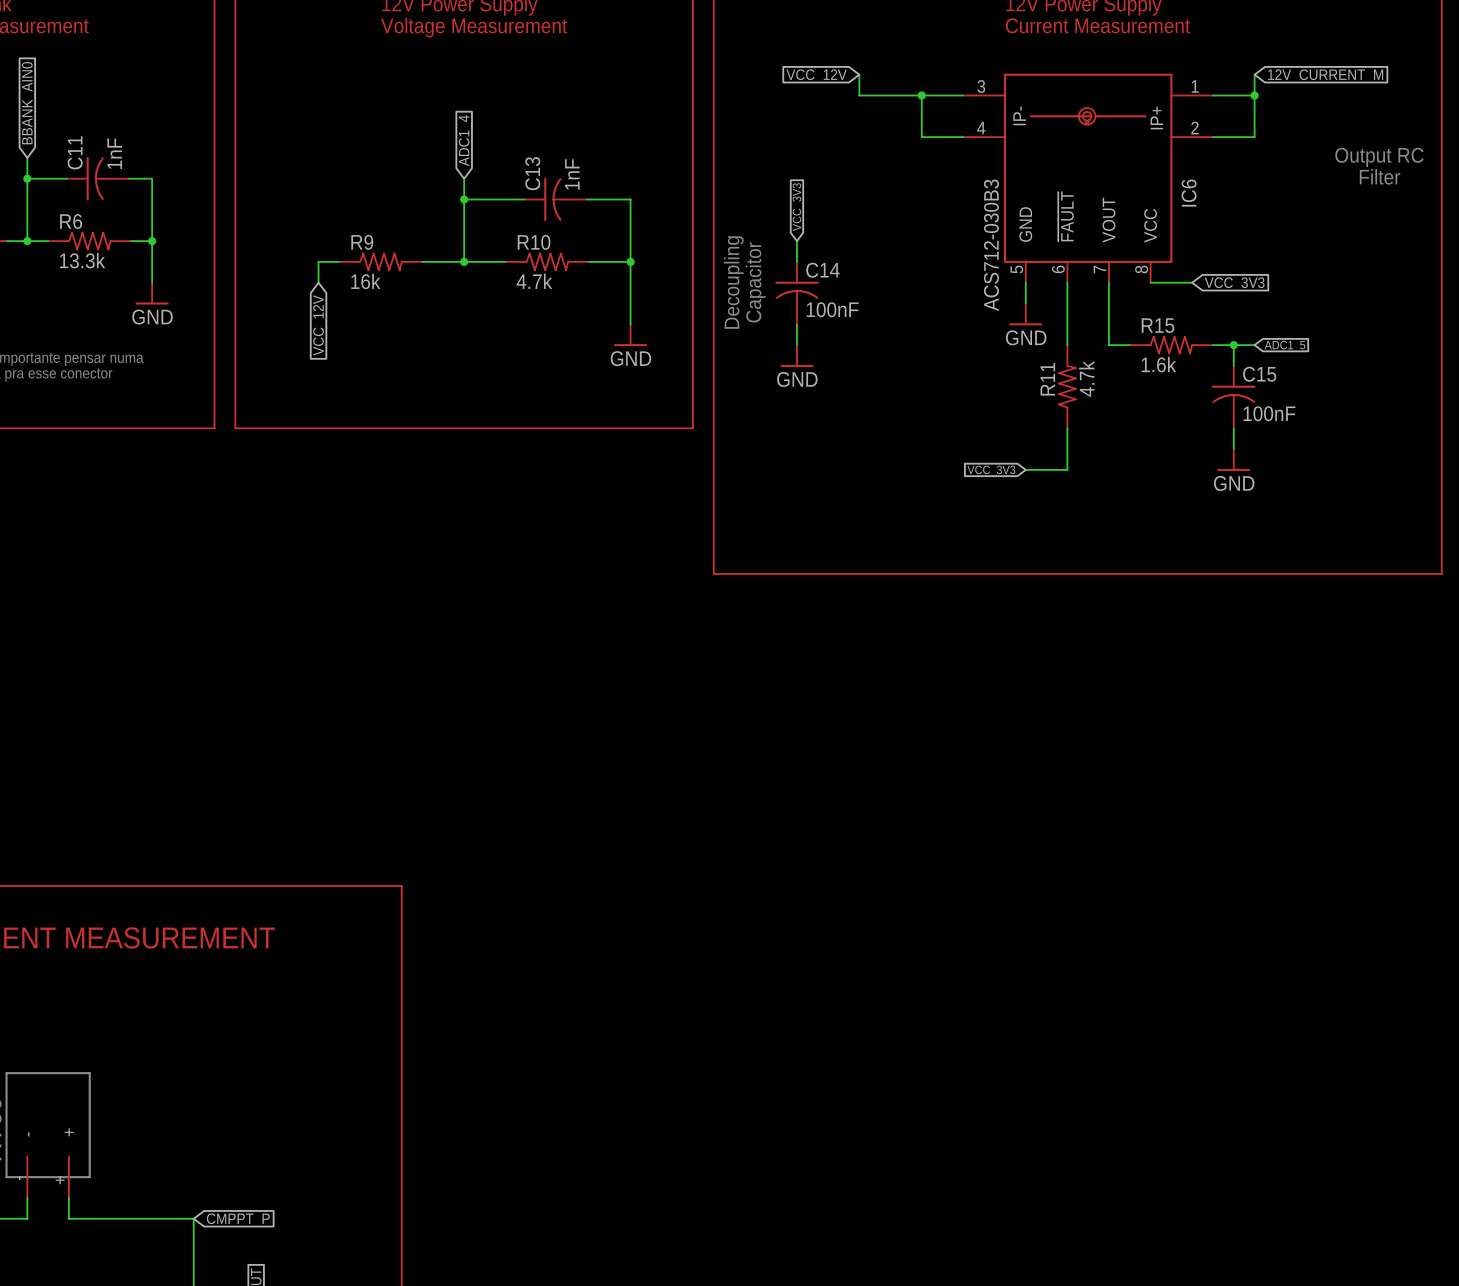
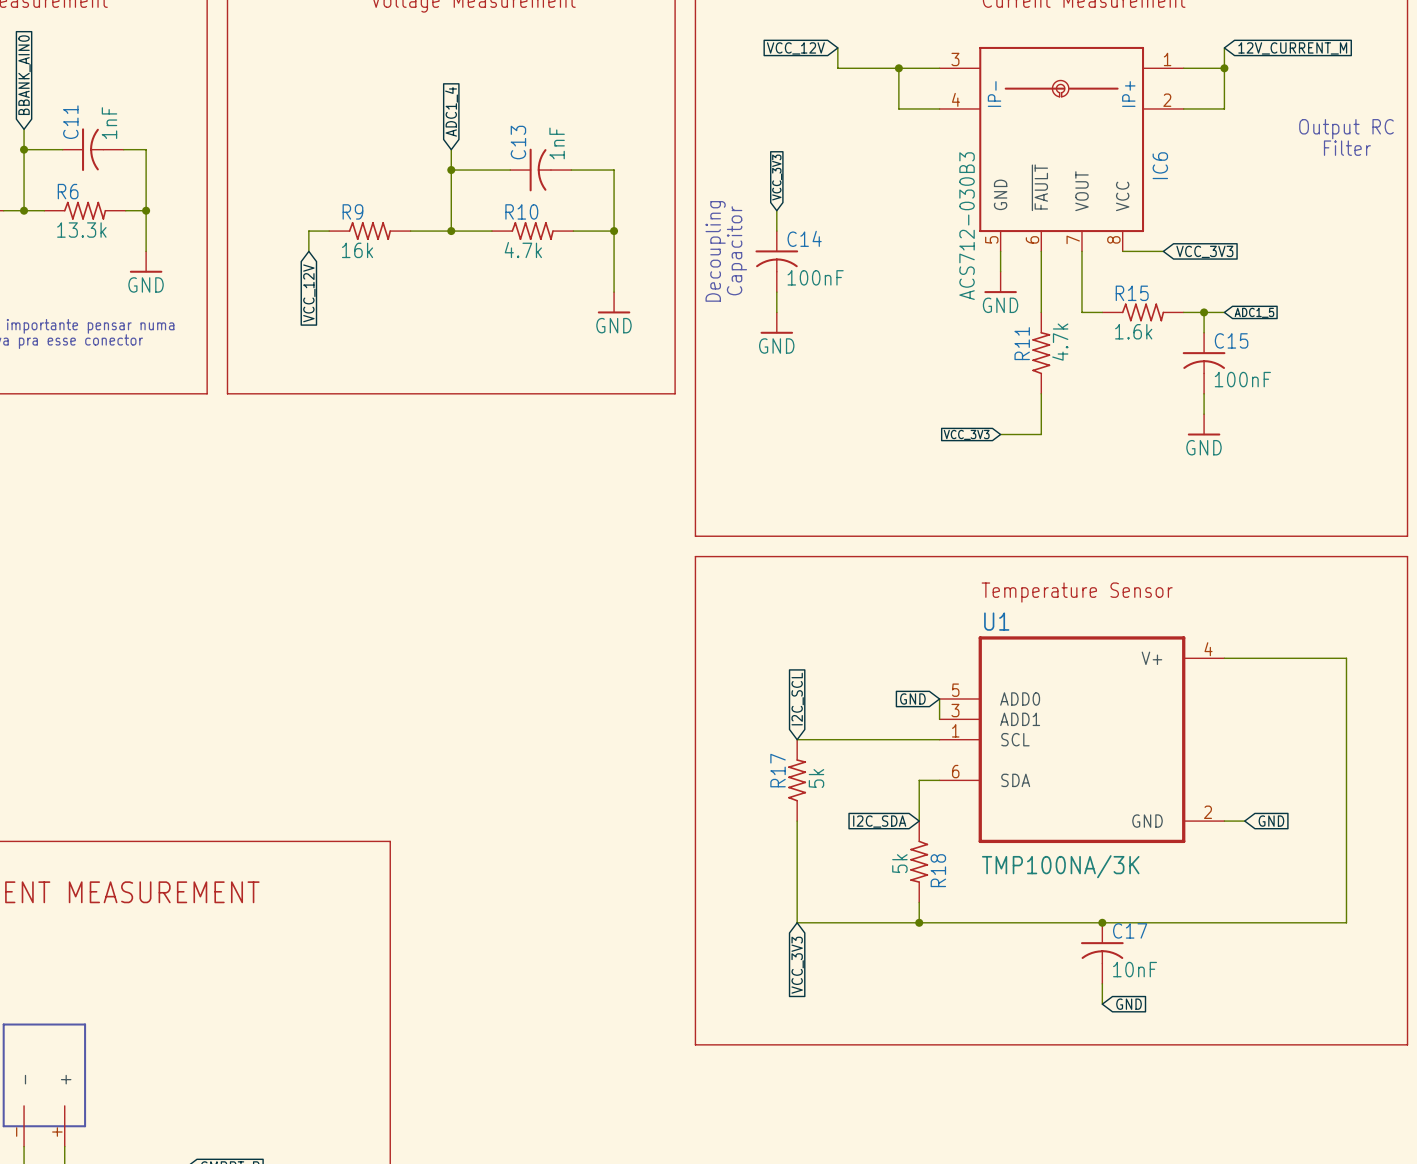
line: none -> (695, 556) (695, 1044) (1407, 1044) (1407, 556) (695, 556)
text: none -> Temperature Sensor (1077, 592)
wire: none -> (1224, 658) (1346, 658) (1346, 922) (797, 922) (797, 821)
global label: none -> GND (912, 699)
wire: none -> (939, 699) (939, 719)
global label: none -> I2C_SCL (797, 699)
wire: none -> (797, 739) (939, 739)
U1: none -> TMP100NA/3K (1081, 739)
R17: none -> 5k (797, 780)
wire: none -> (939, 780) (919, 780) (919, 821)
wire: none -> (1224, 821) (1244, 821)
global label: none -> GND (1271, 821)
global label: none -> I2C_SDA (879, 821)
R18: none -> 5k (919, 861)
wire: none -> (919, 902) (919, 922)
junction: none -> (919, 922)
junction: none -> (1102, 922)
C17: none -> 10nF (1102, 953)
global label: none -> VCC_3V3 (797, 965)
wire: none -> (1102, 983) (1102, 1004)
global label: none -> GND (1129, 1004)

